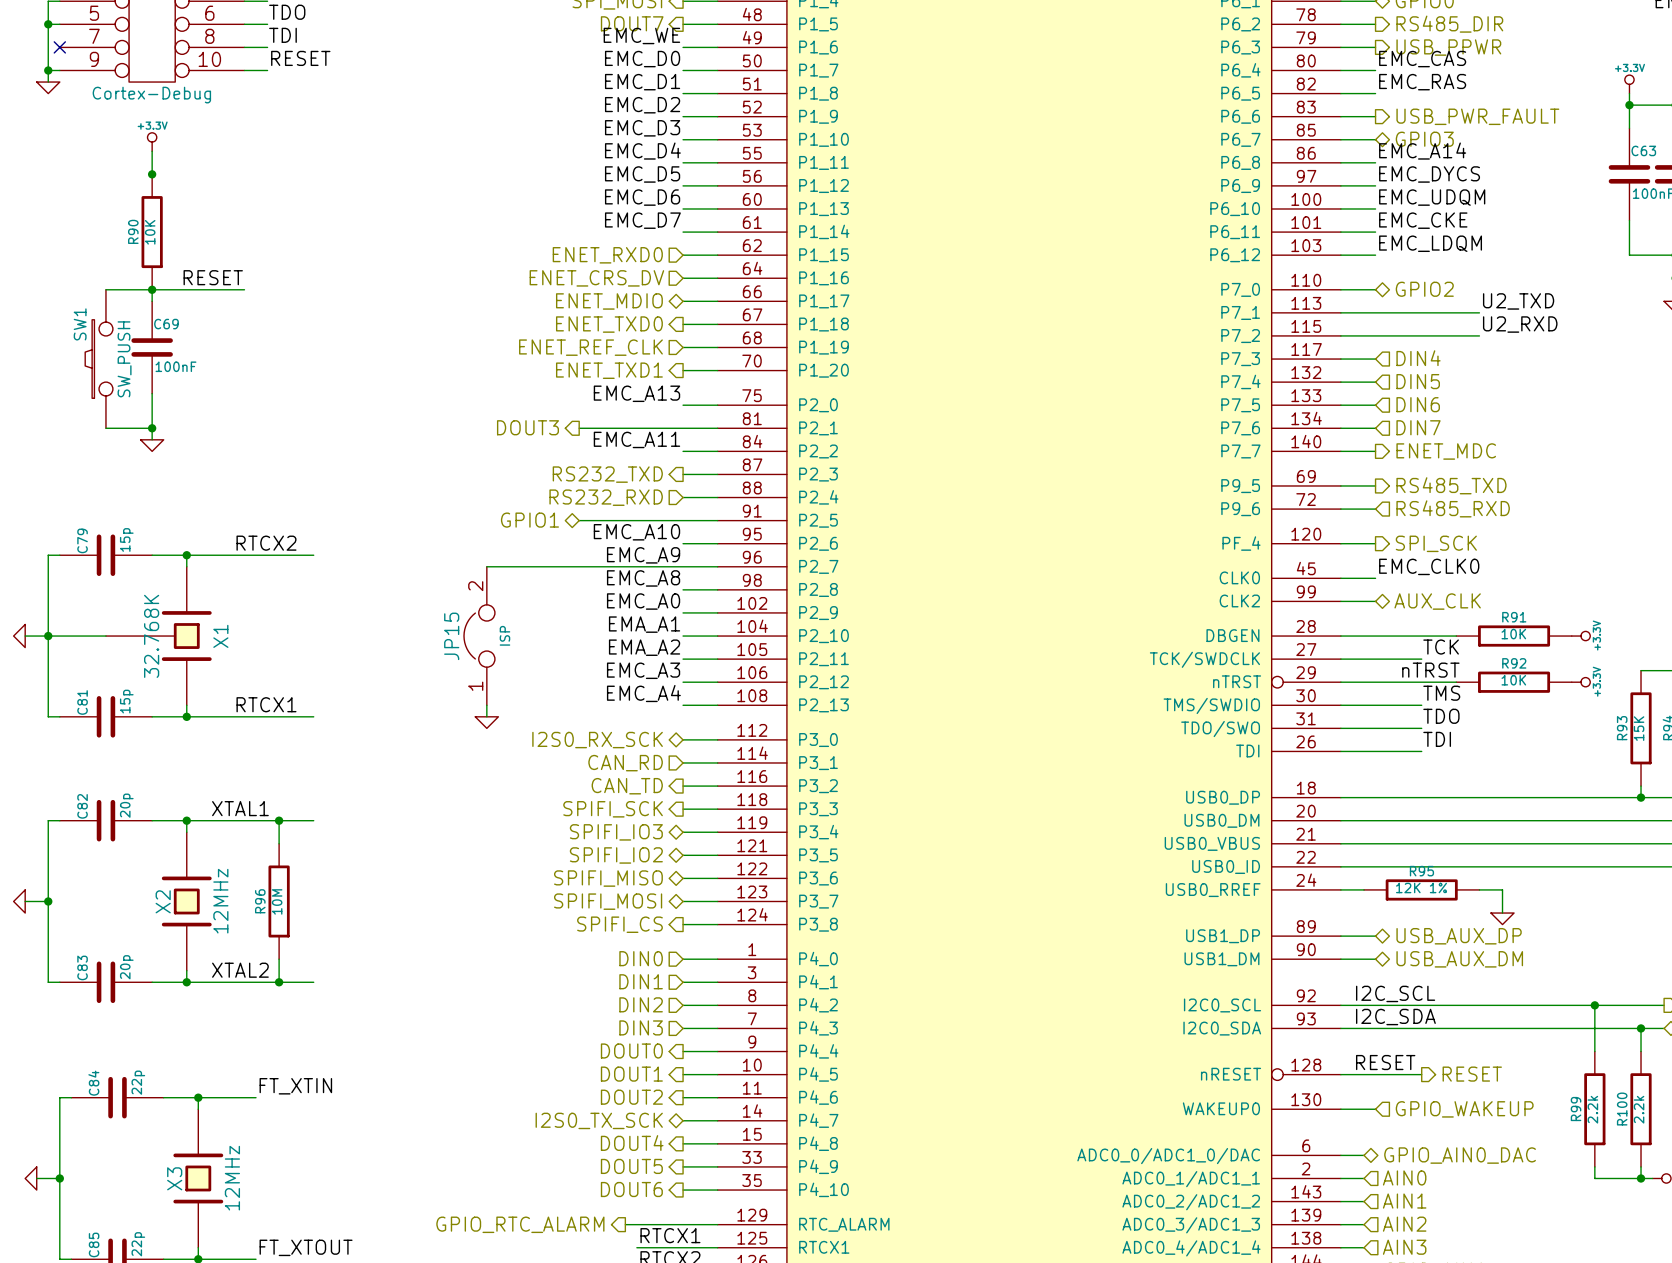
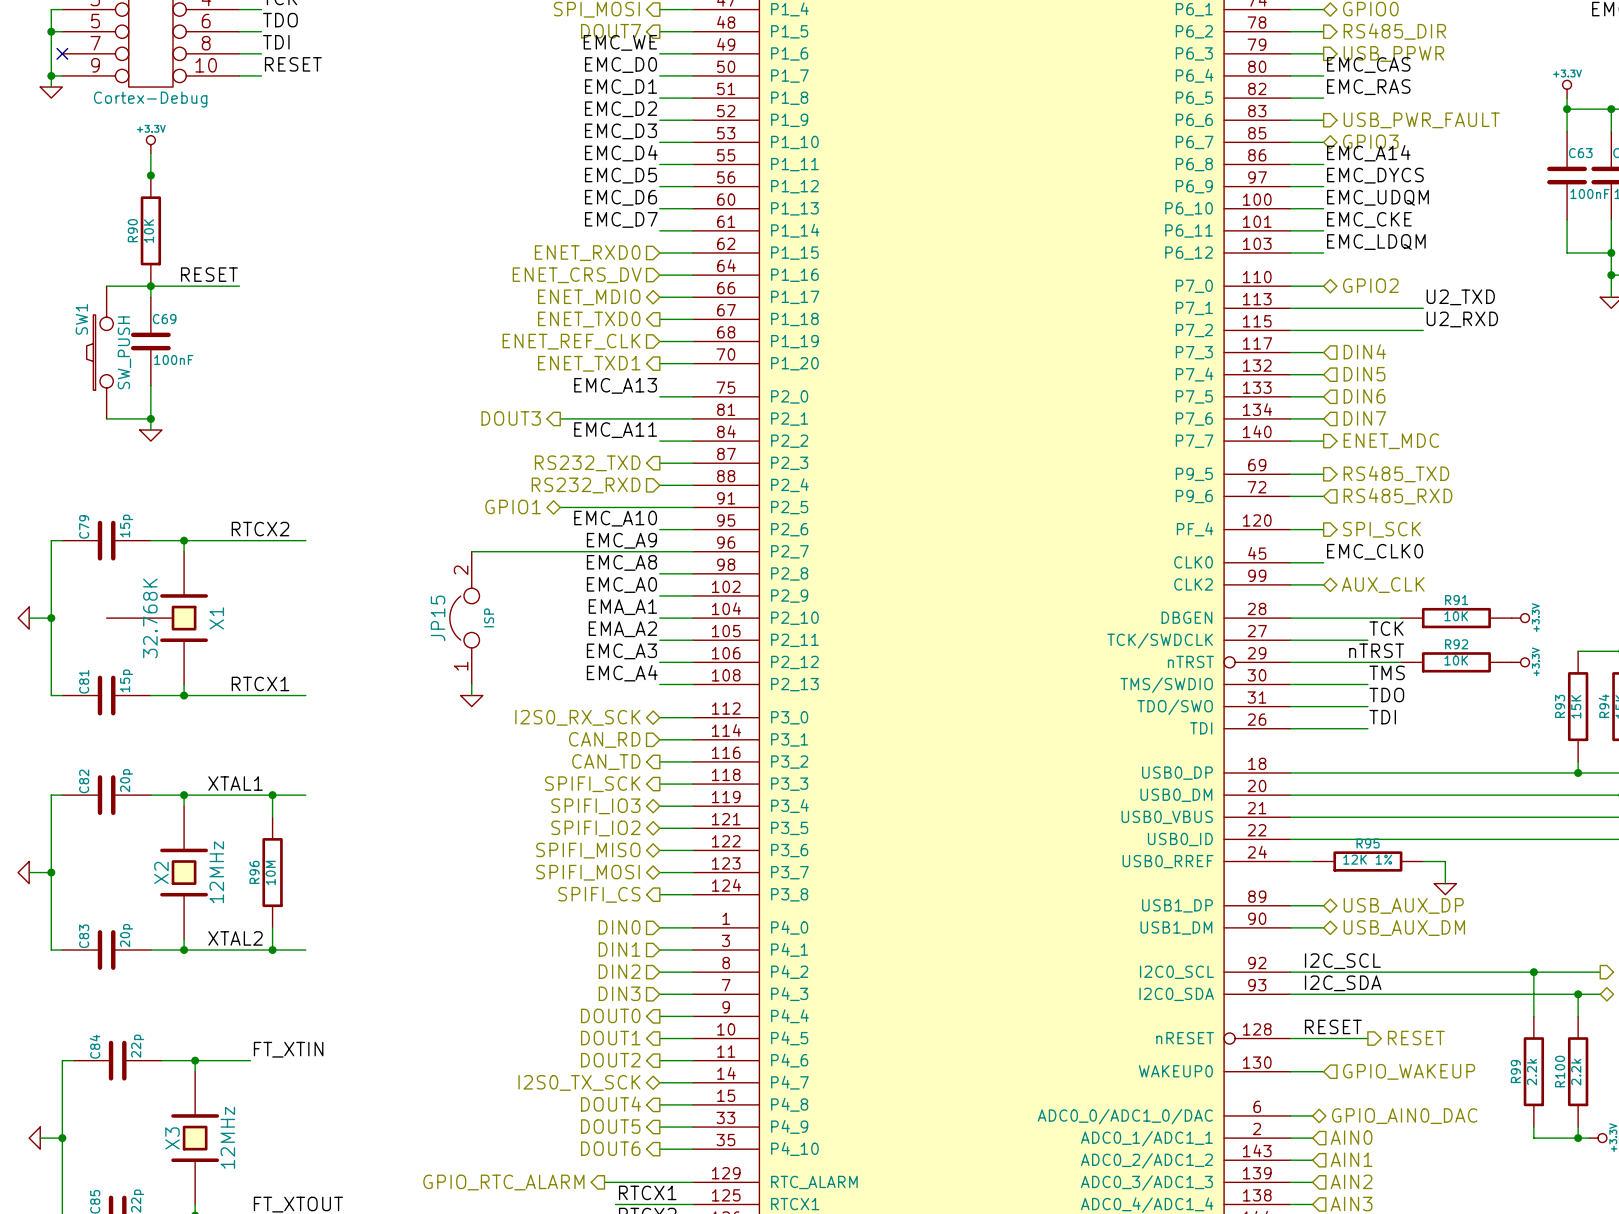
wire: (48, 636) (105, 636) -> none

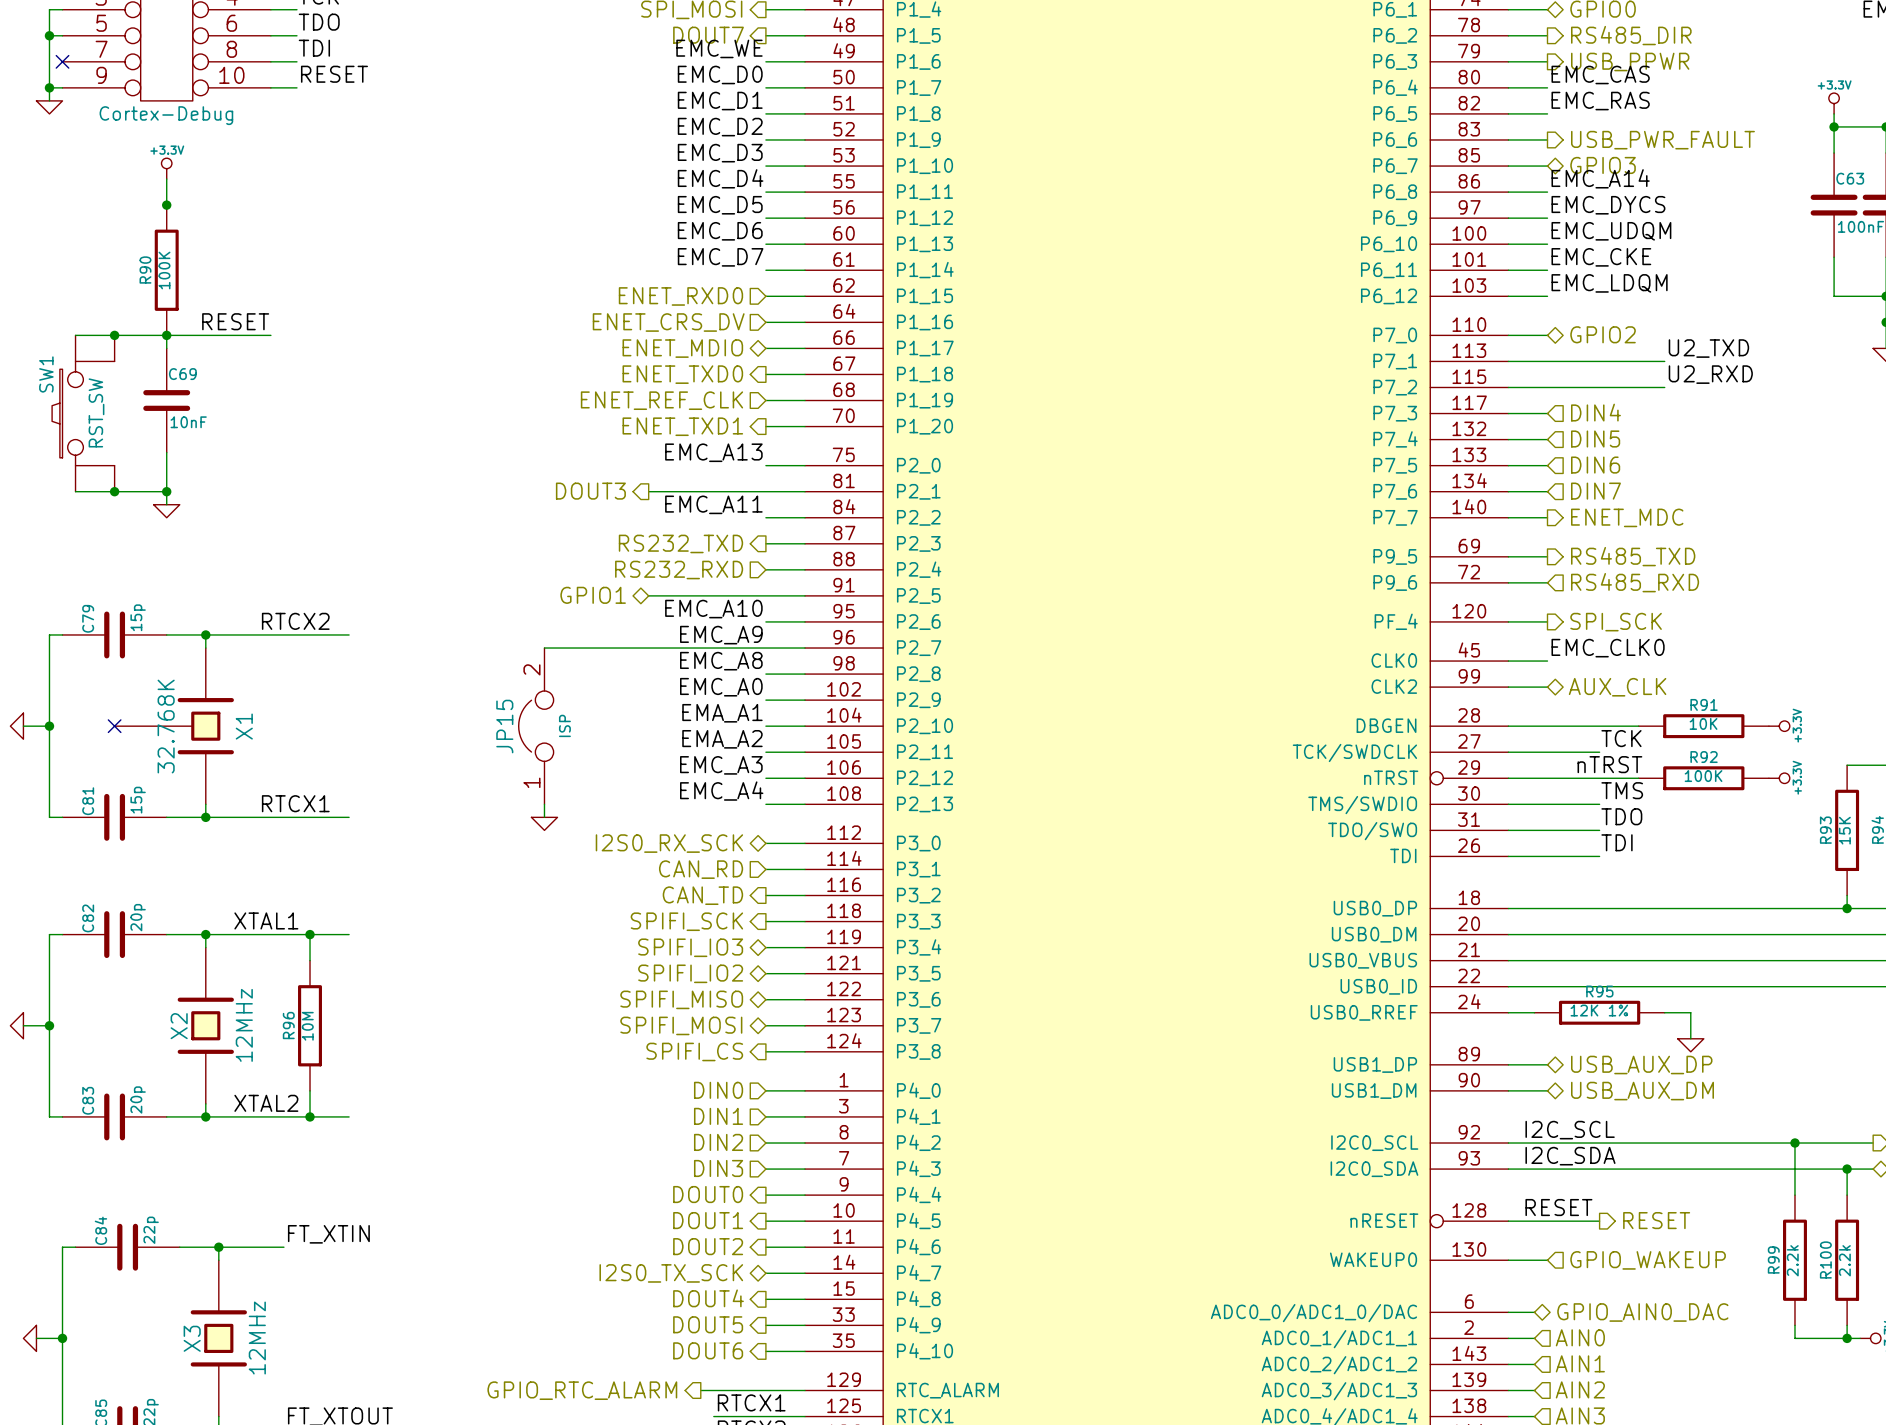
R90 value: 10K (148, 231) -> 100K (164, 270)
wire: none -> (75, 335) (114, 335)
SW1 symbol: [86, 286, 114, 419] -> [52, 335, 115, 492]
junction: none -> (114, 335)
SW1 value: SW_PUSH (124, 352) -> RST_SW (96, 412)
C69 value: 100nF (173, 359) -> 10nF (188, 422)
wire: none -> (75, 491) (114, 491)
junction: none -> (114, 491)
no-connect mark: none -> (114, 726)
R92 value: 10K (1456, 660) -> 100K (1703, 776)

